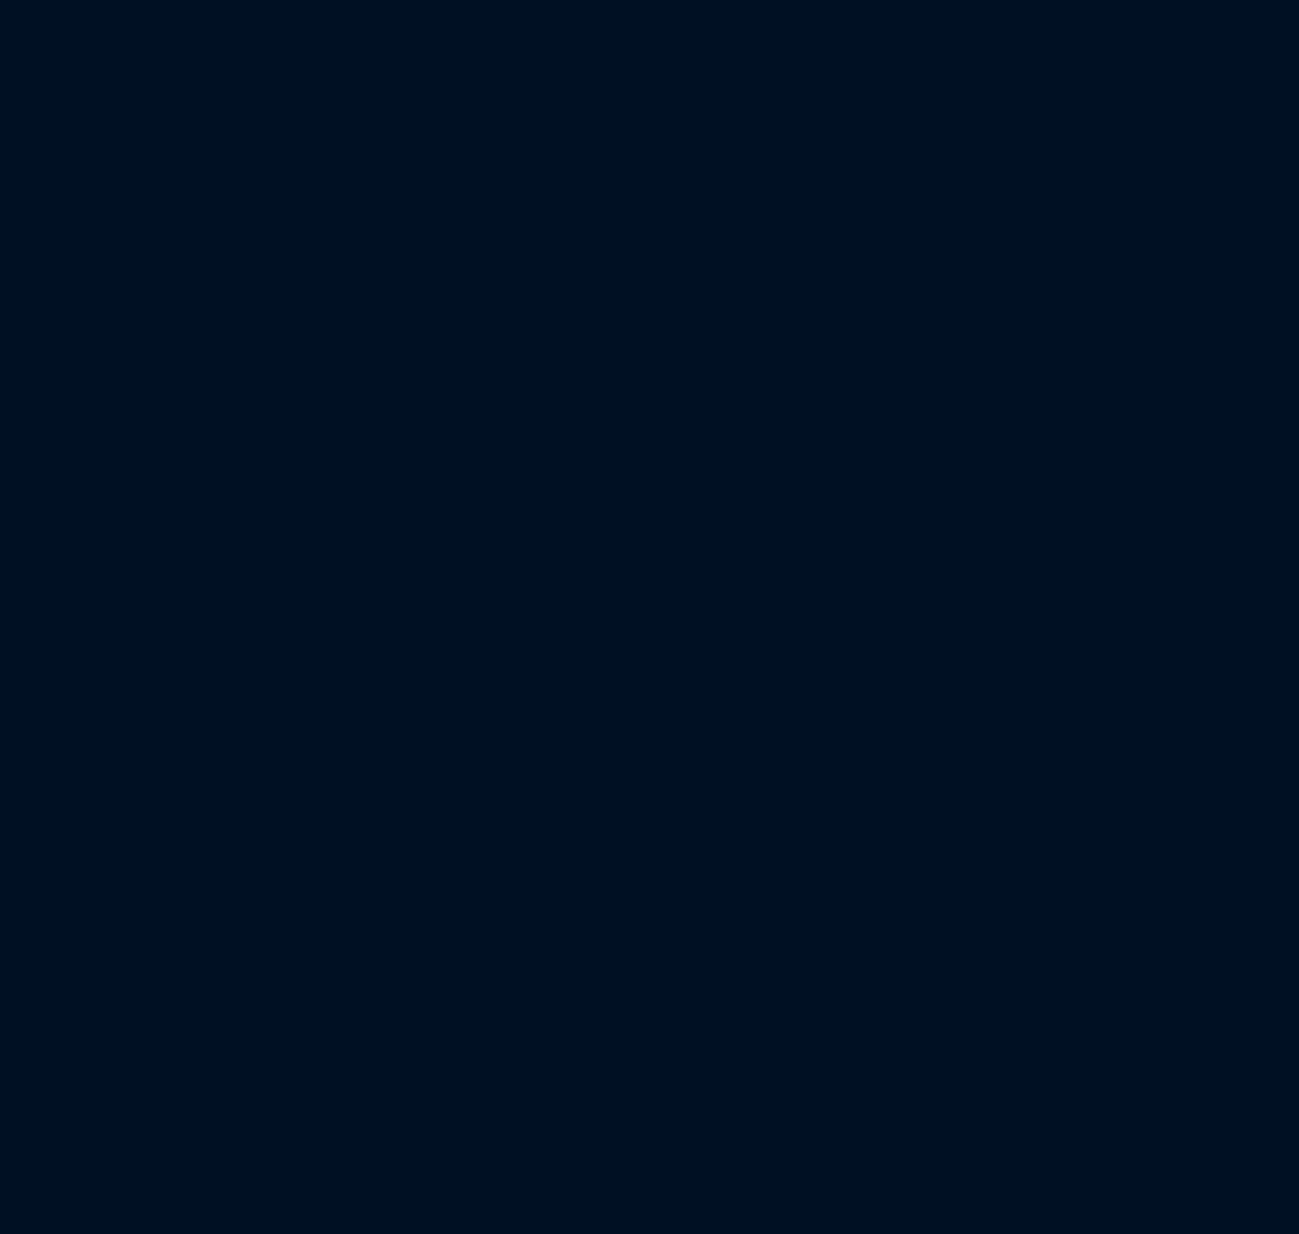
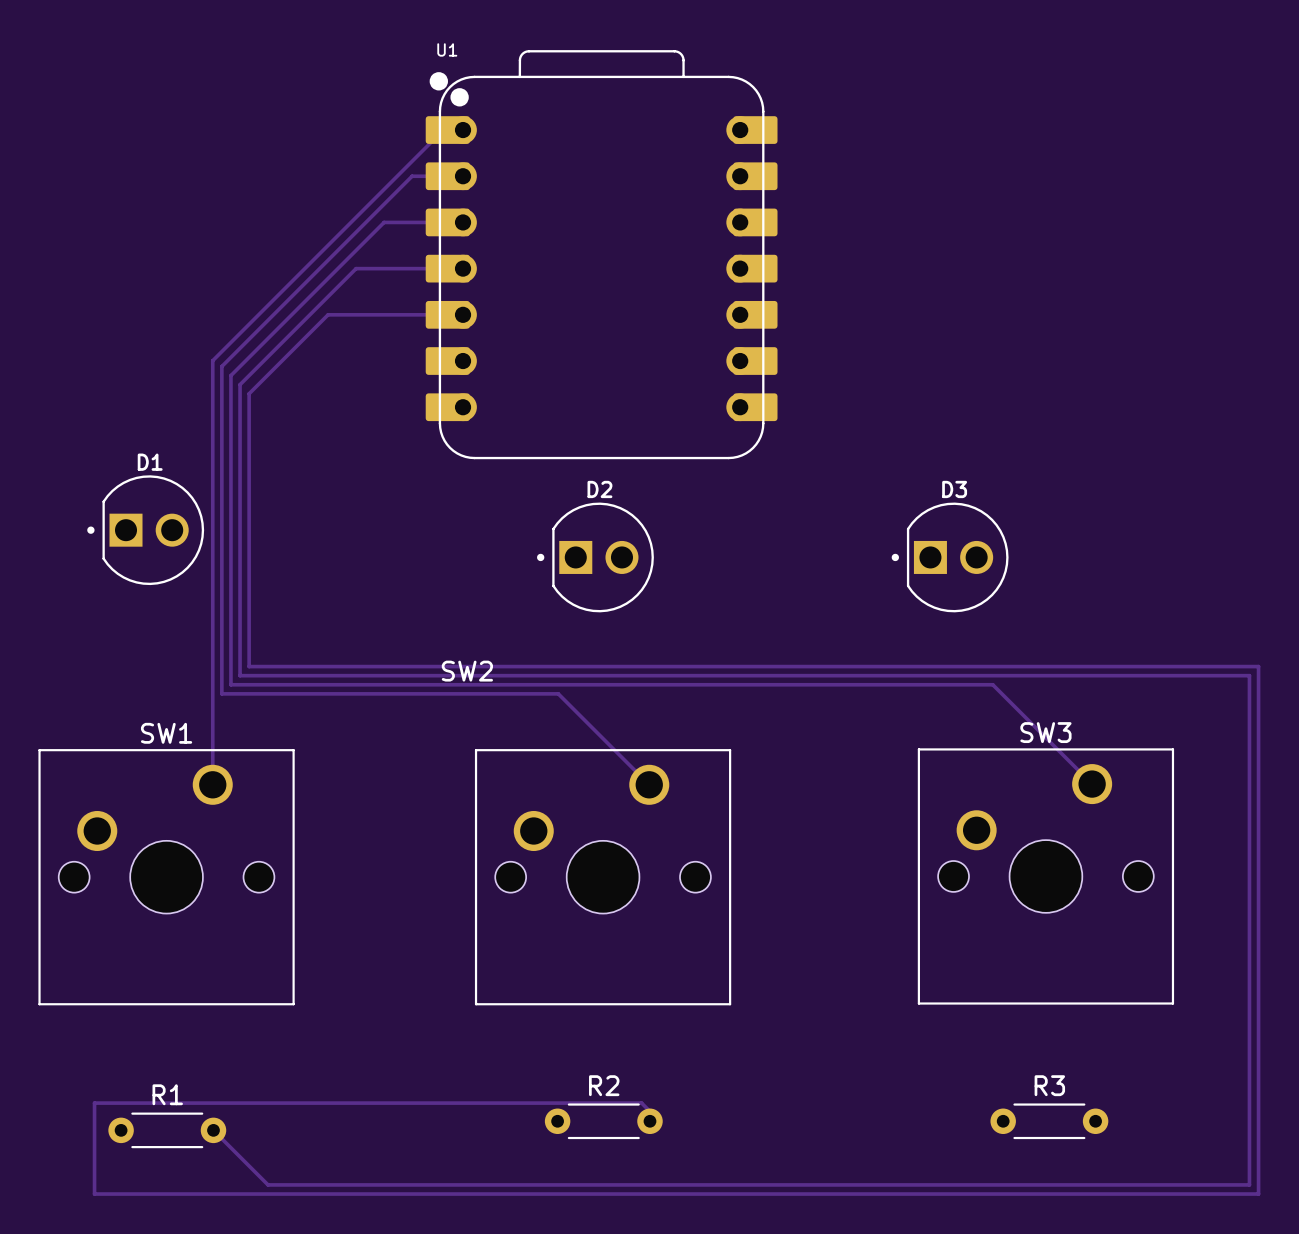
track: none -> (463, 130) (443, 130) (212, 360) (212, 784)
track: none -> (463, 176) (412, 176) (221, 366) (221, 693) (558, 693) (649, 784)
track: none -> (463, 222) (384, 222) (230, 375) (230, 684) (992, 684) (1092, 784)
U1: none -> (601, 254)
track: none -> (463, 268) (356, 268) (240, 384) (240, 675) (1249, 675) (1249, 1184) (268, 1184) (213, 1130)
track: none -> (463, 314) (328, 314) (249, 393) (249, 666) (1258, 666) (1258, 1194) (94, 1194) (94, 1103) (641, 1103) (649, 1111) (649, 1121)
D1: none -> (145, 530)
D2: none -> (595, 557)
D3: none -> (950, 557)
SW3: none -> (1045, 876)
SW1: none -> (166, 877)
SW2: none -> (603, 877)
R2: none -> (603, 1121)
R3: none -> (1049, 1121)
R1: none -> (167, 1130)

